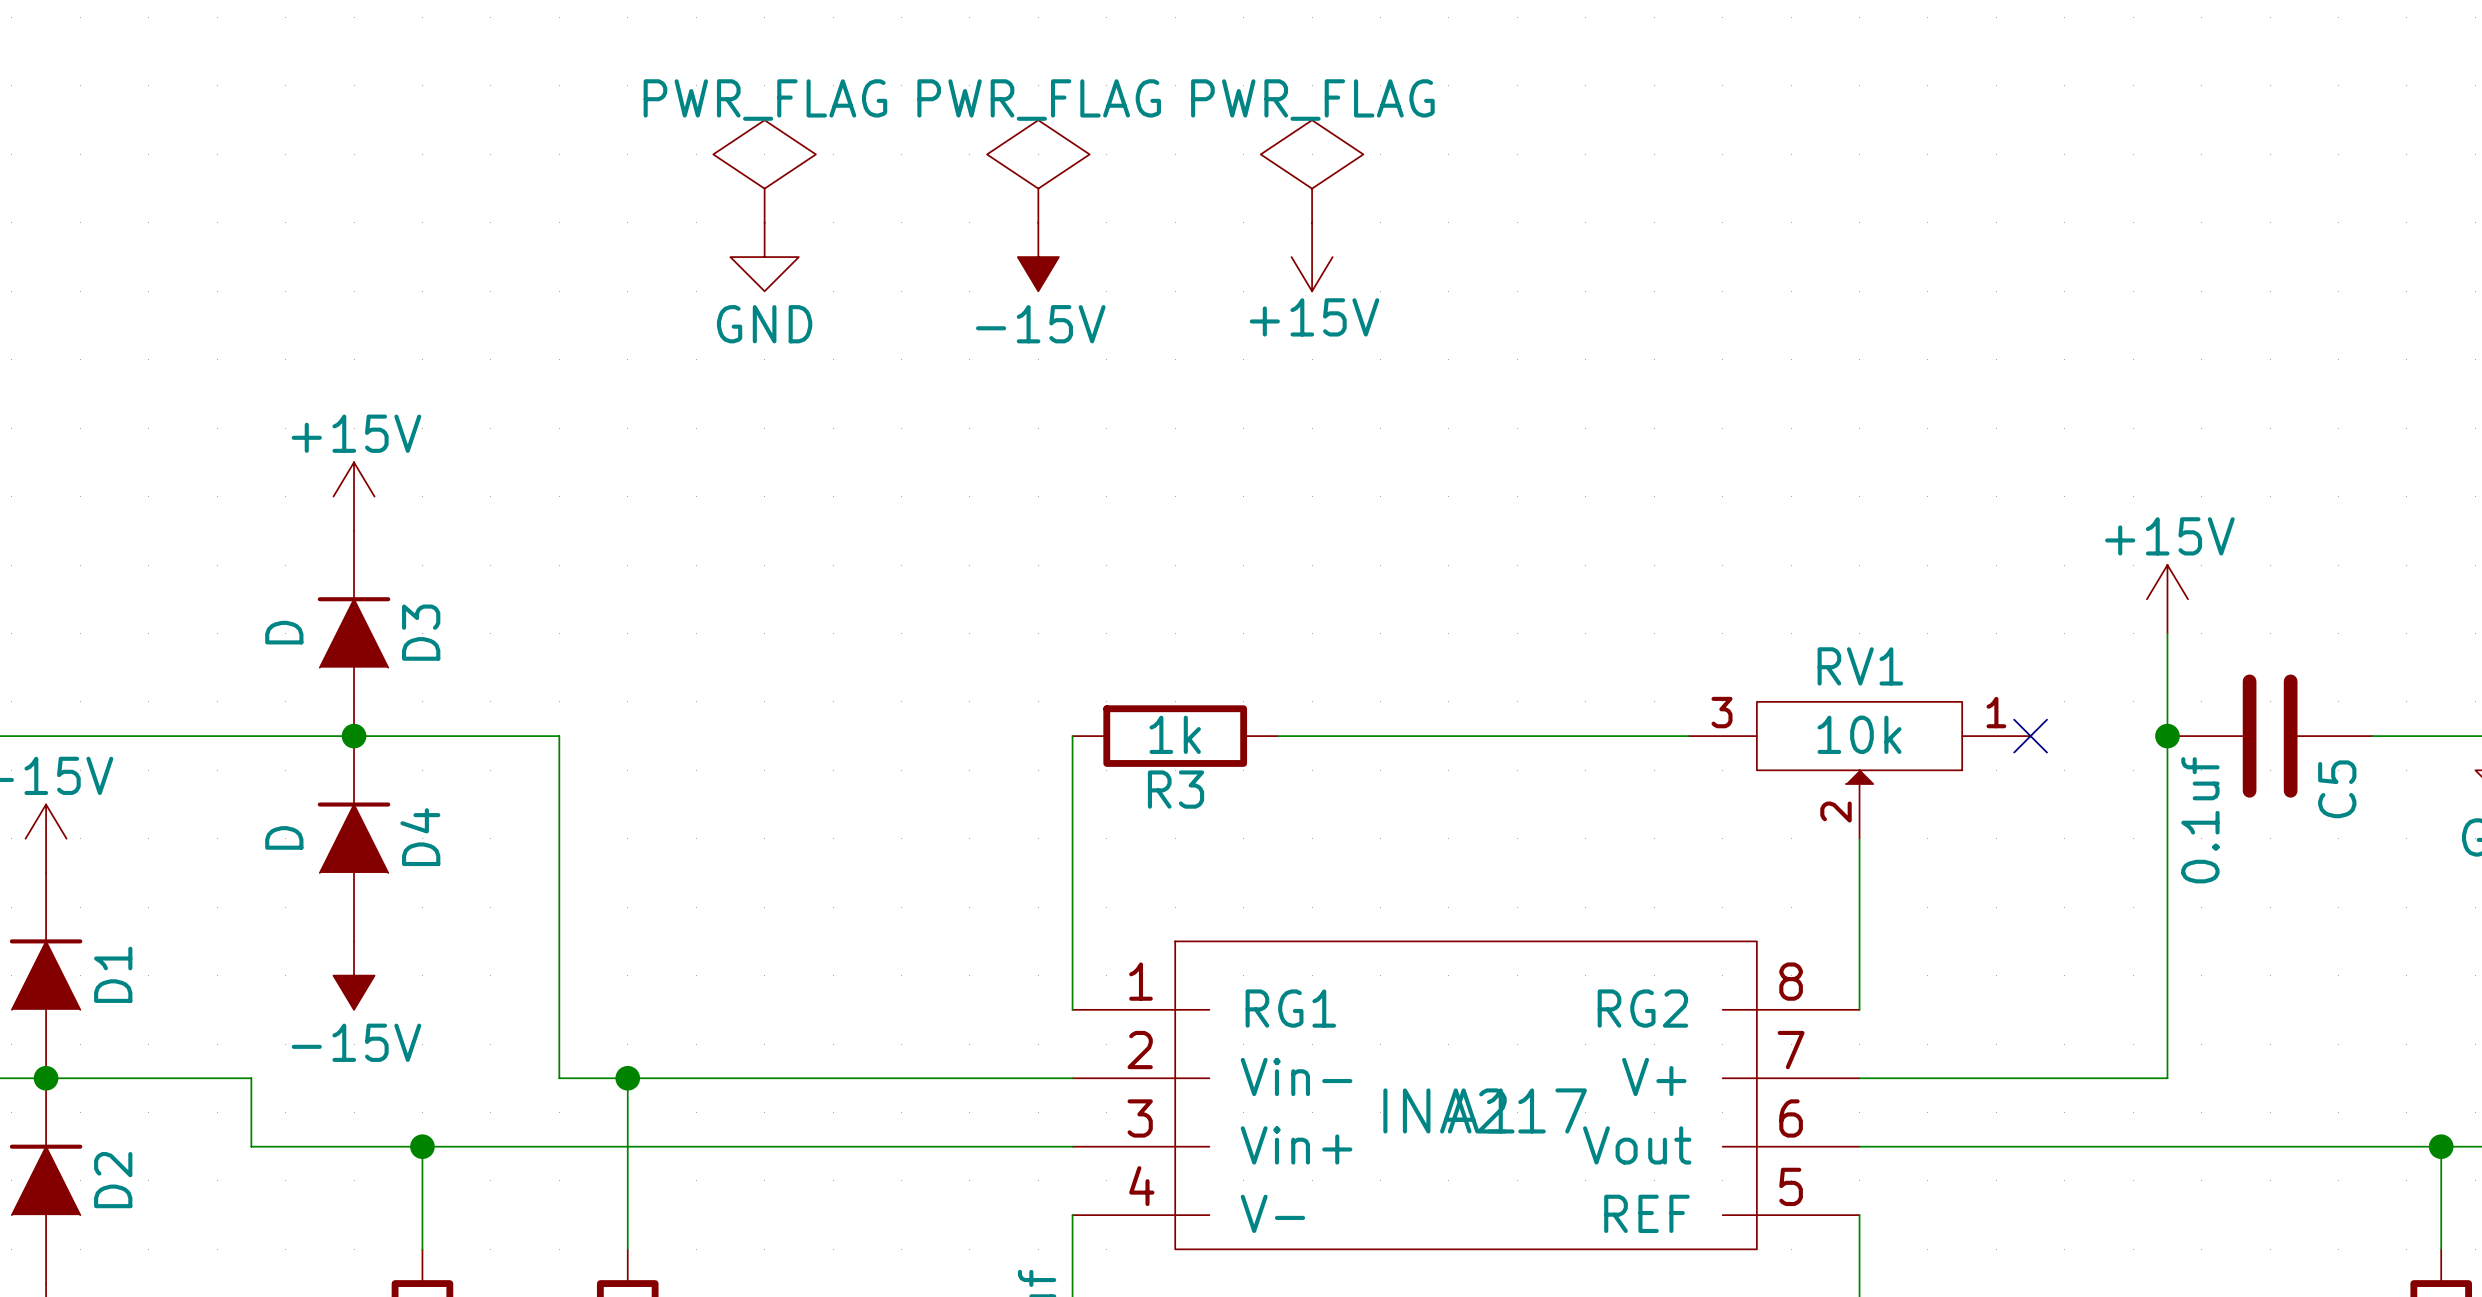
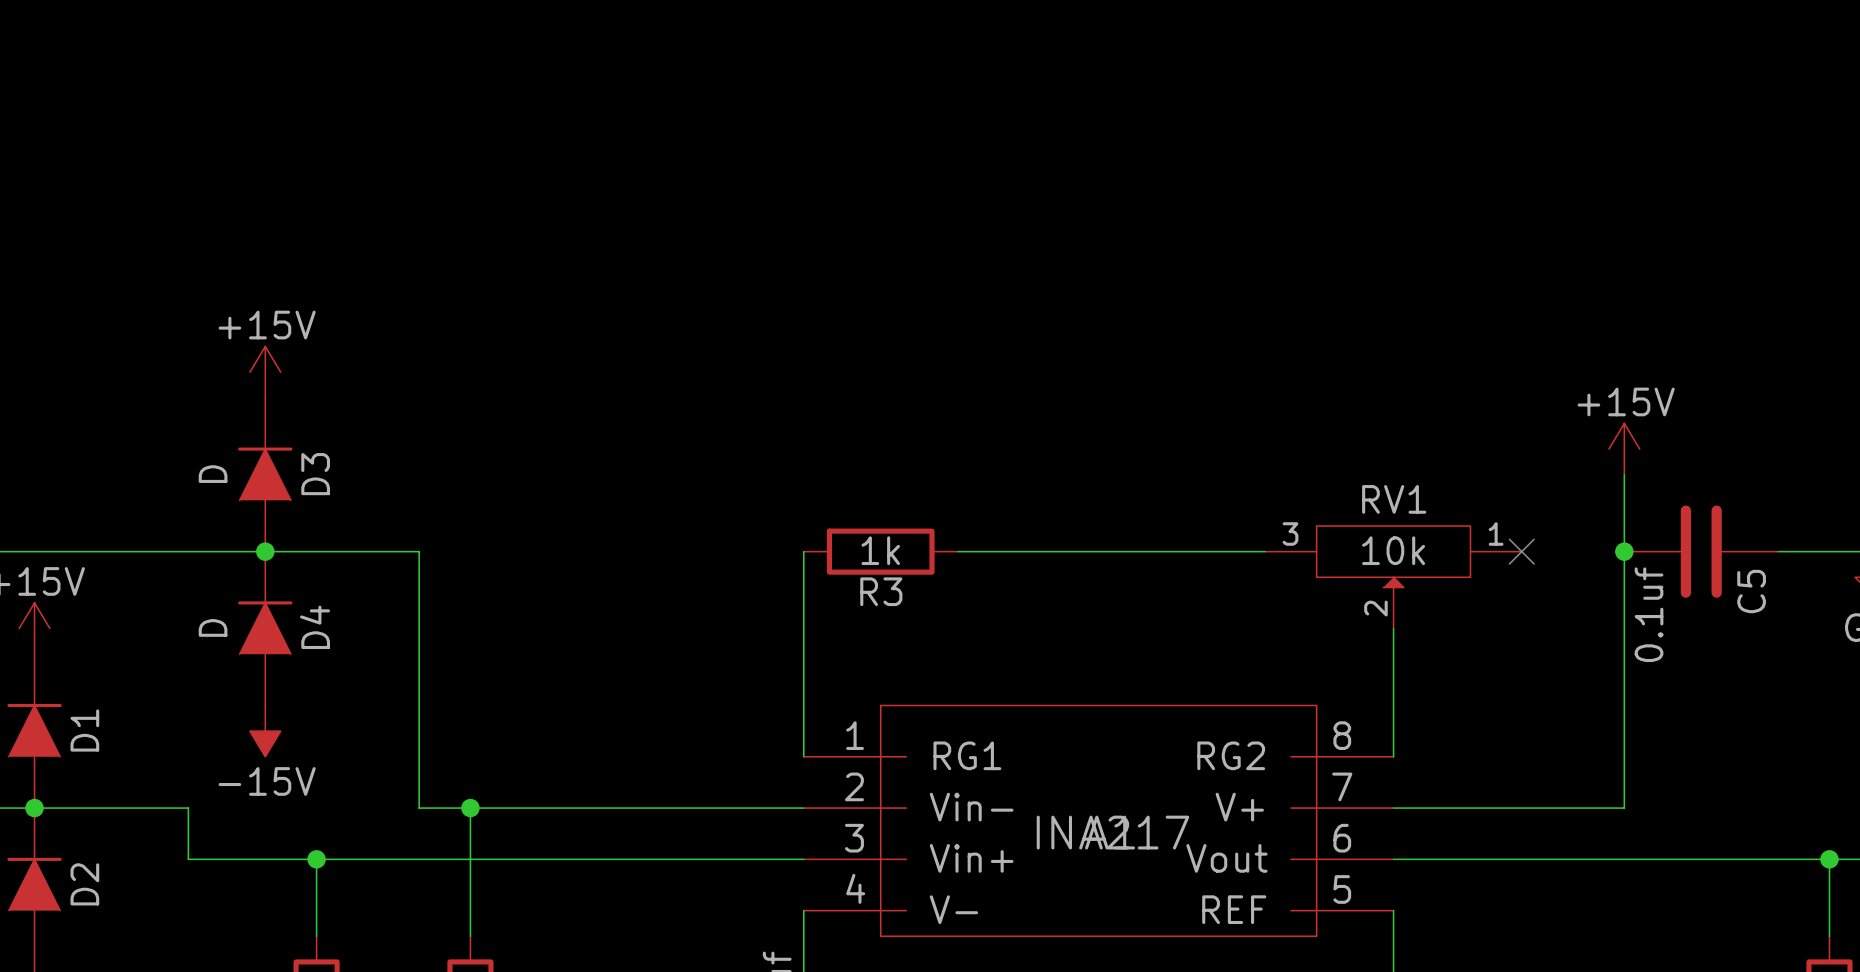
power symbol: PWR_FLAG (764, 171) -> none
power symbol: PWR_FLAG (1038, 171) -> none
power symbol: PWR_FLAG (1312, 171) -> none
power symbol: GND (764, 257) -> none
power symbol: -15V (1038, 257) -> none
power symbol: +15V (1312, 257) -> none

